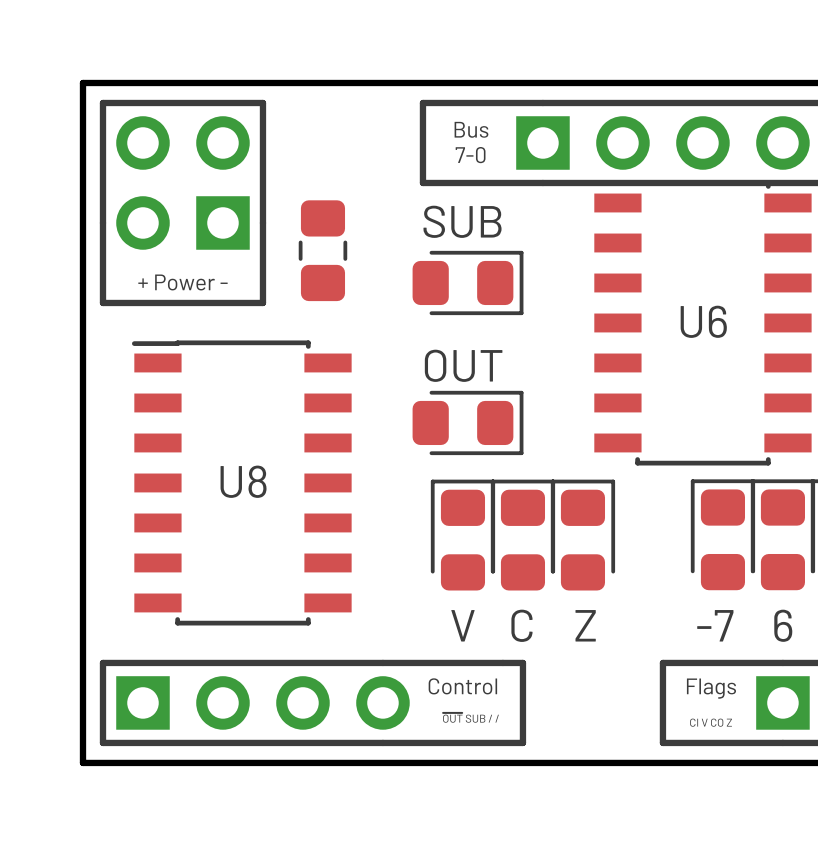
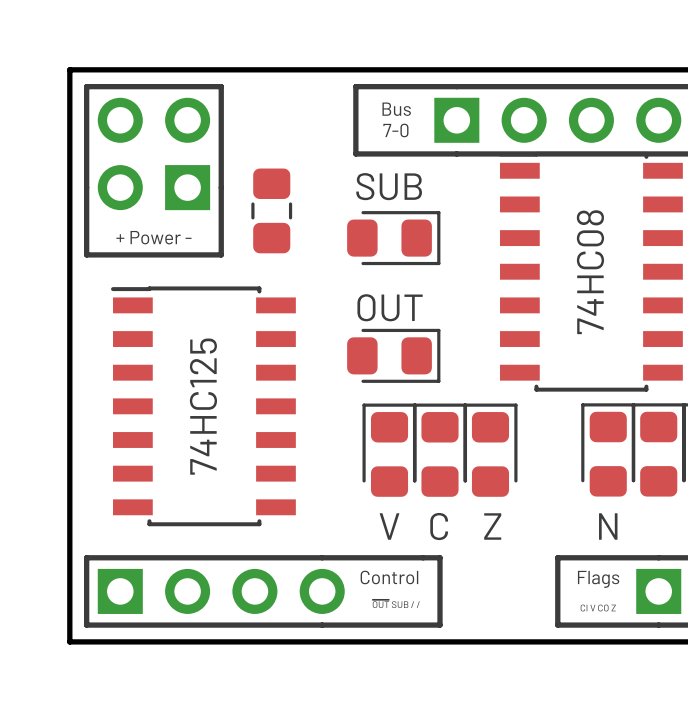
U6 name: U6 (703, 321) -> none
U6 value: none -> 74HC08 (590, 272)
U8 name: U8 (243, 481) -> none
U8 value: none -> 74HC125 (203, 406)
part value: -7 (715, 625) -> N (608, 526)
part value: 6 (783, 625) -> none

